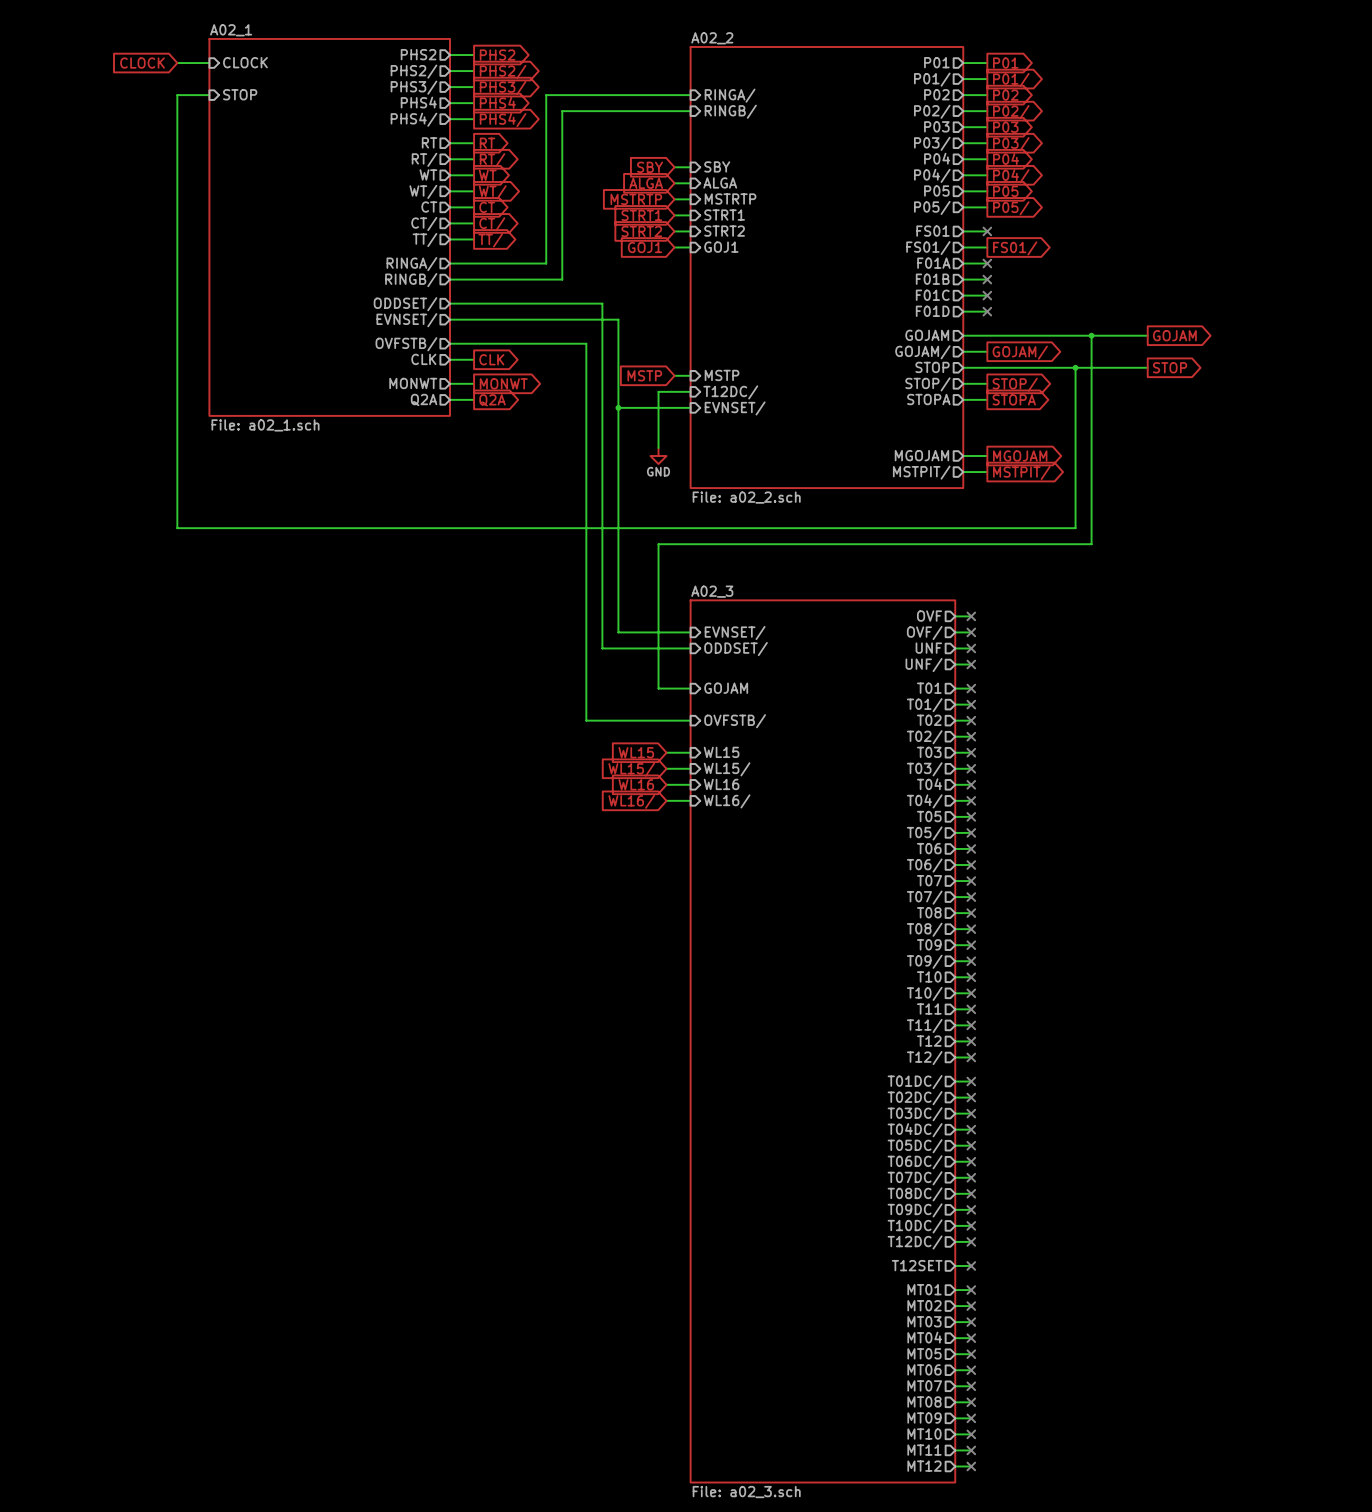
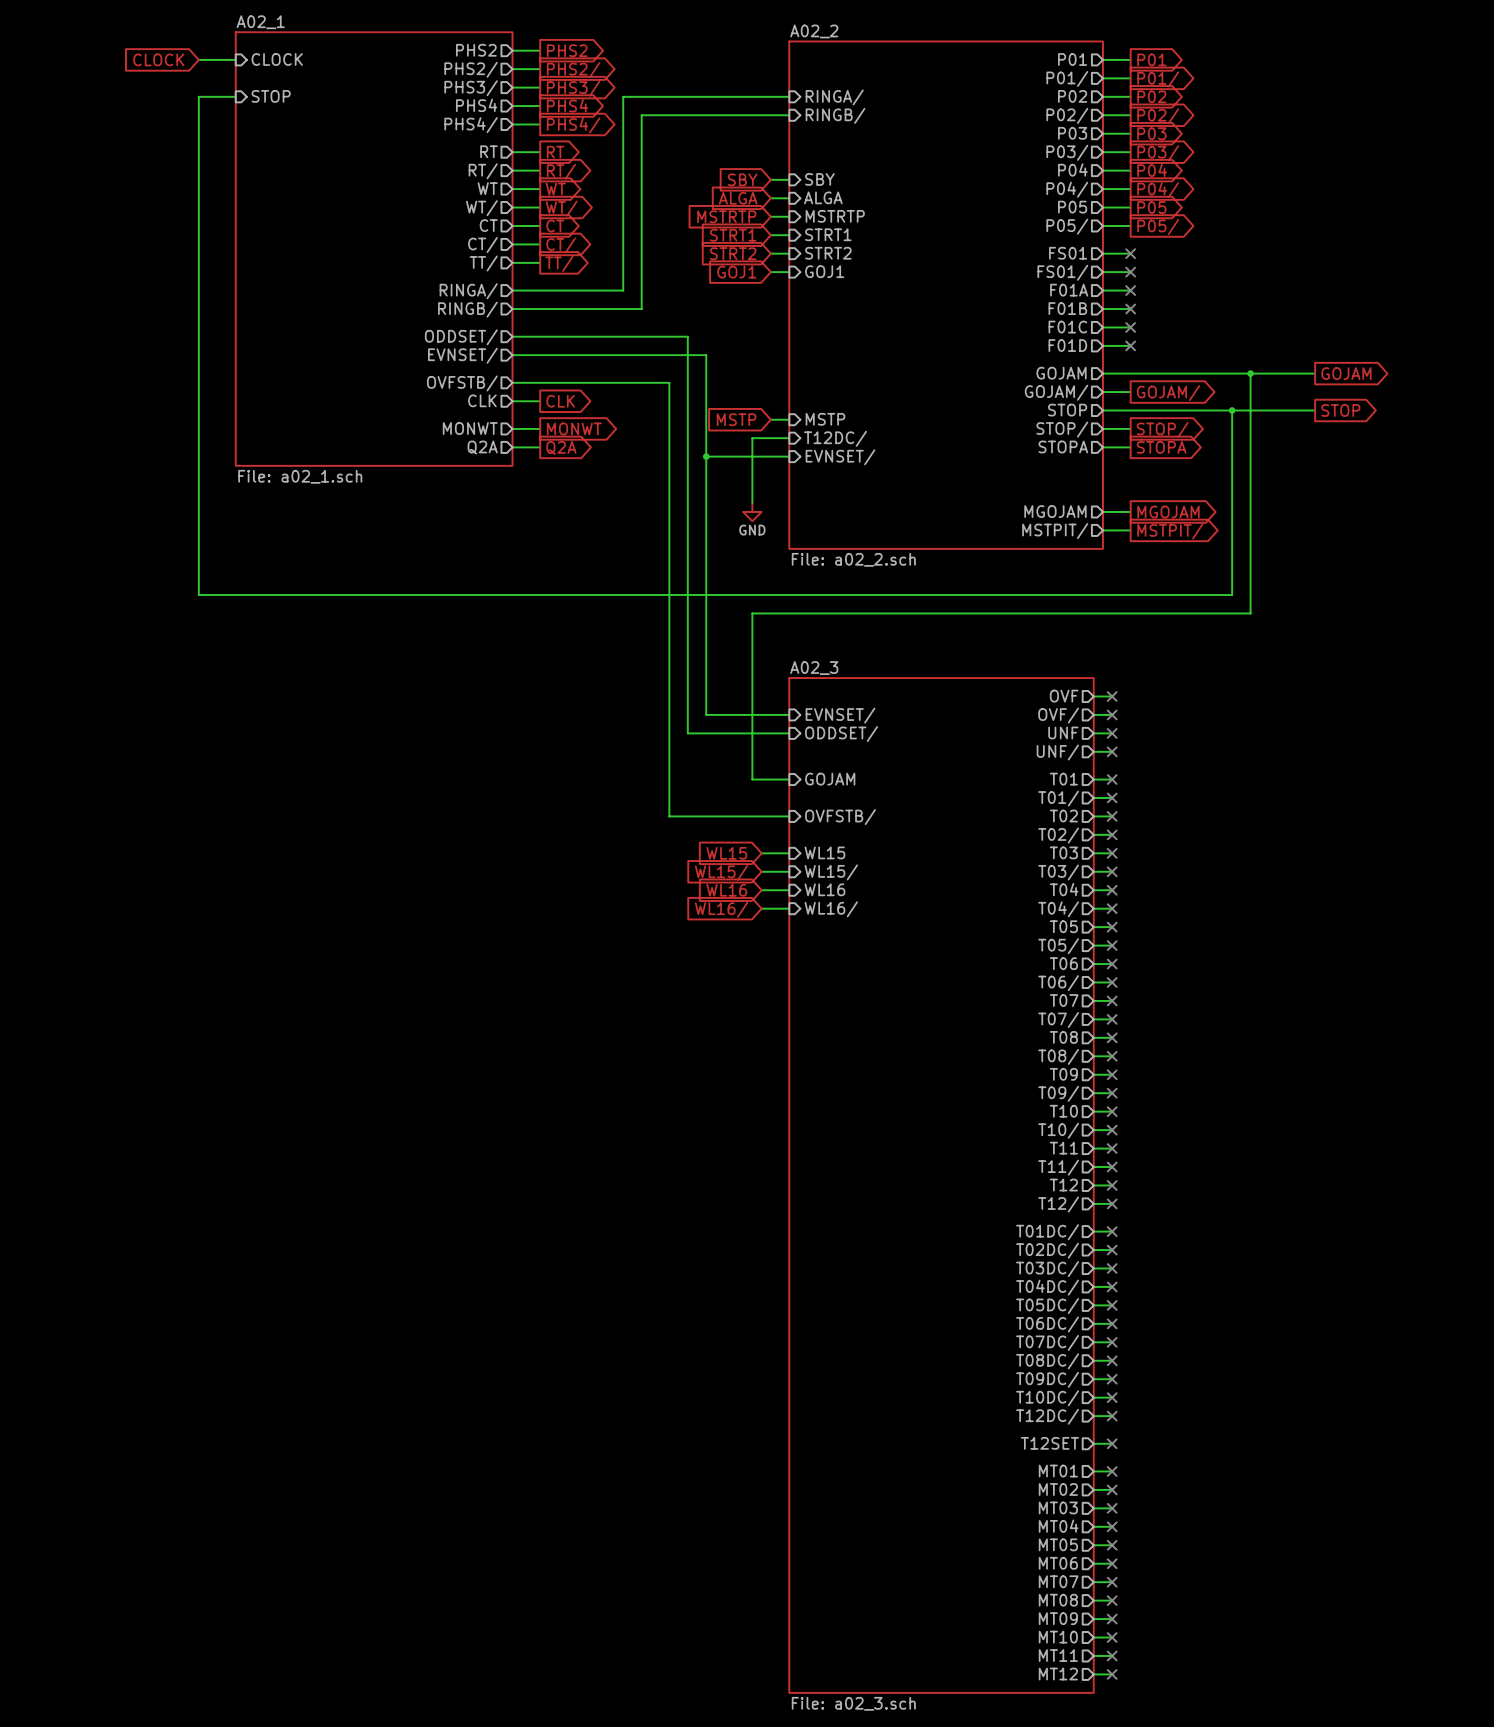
no-connect mark: none -> (1130, 272)
global label: FS01/ (1015, 248) -> none

